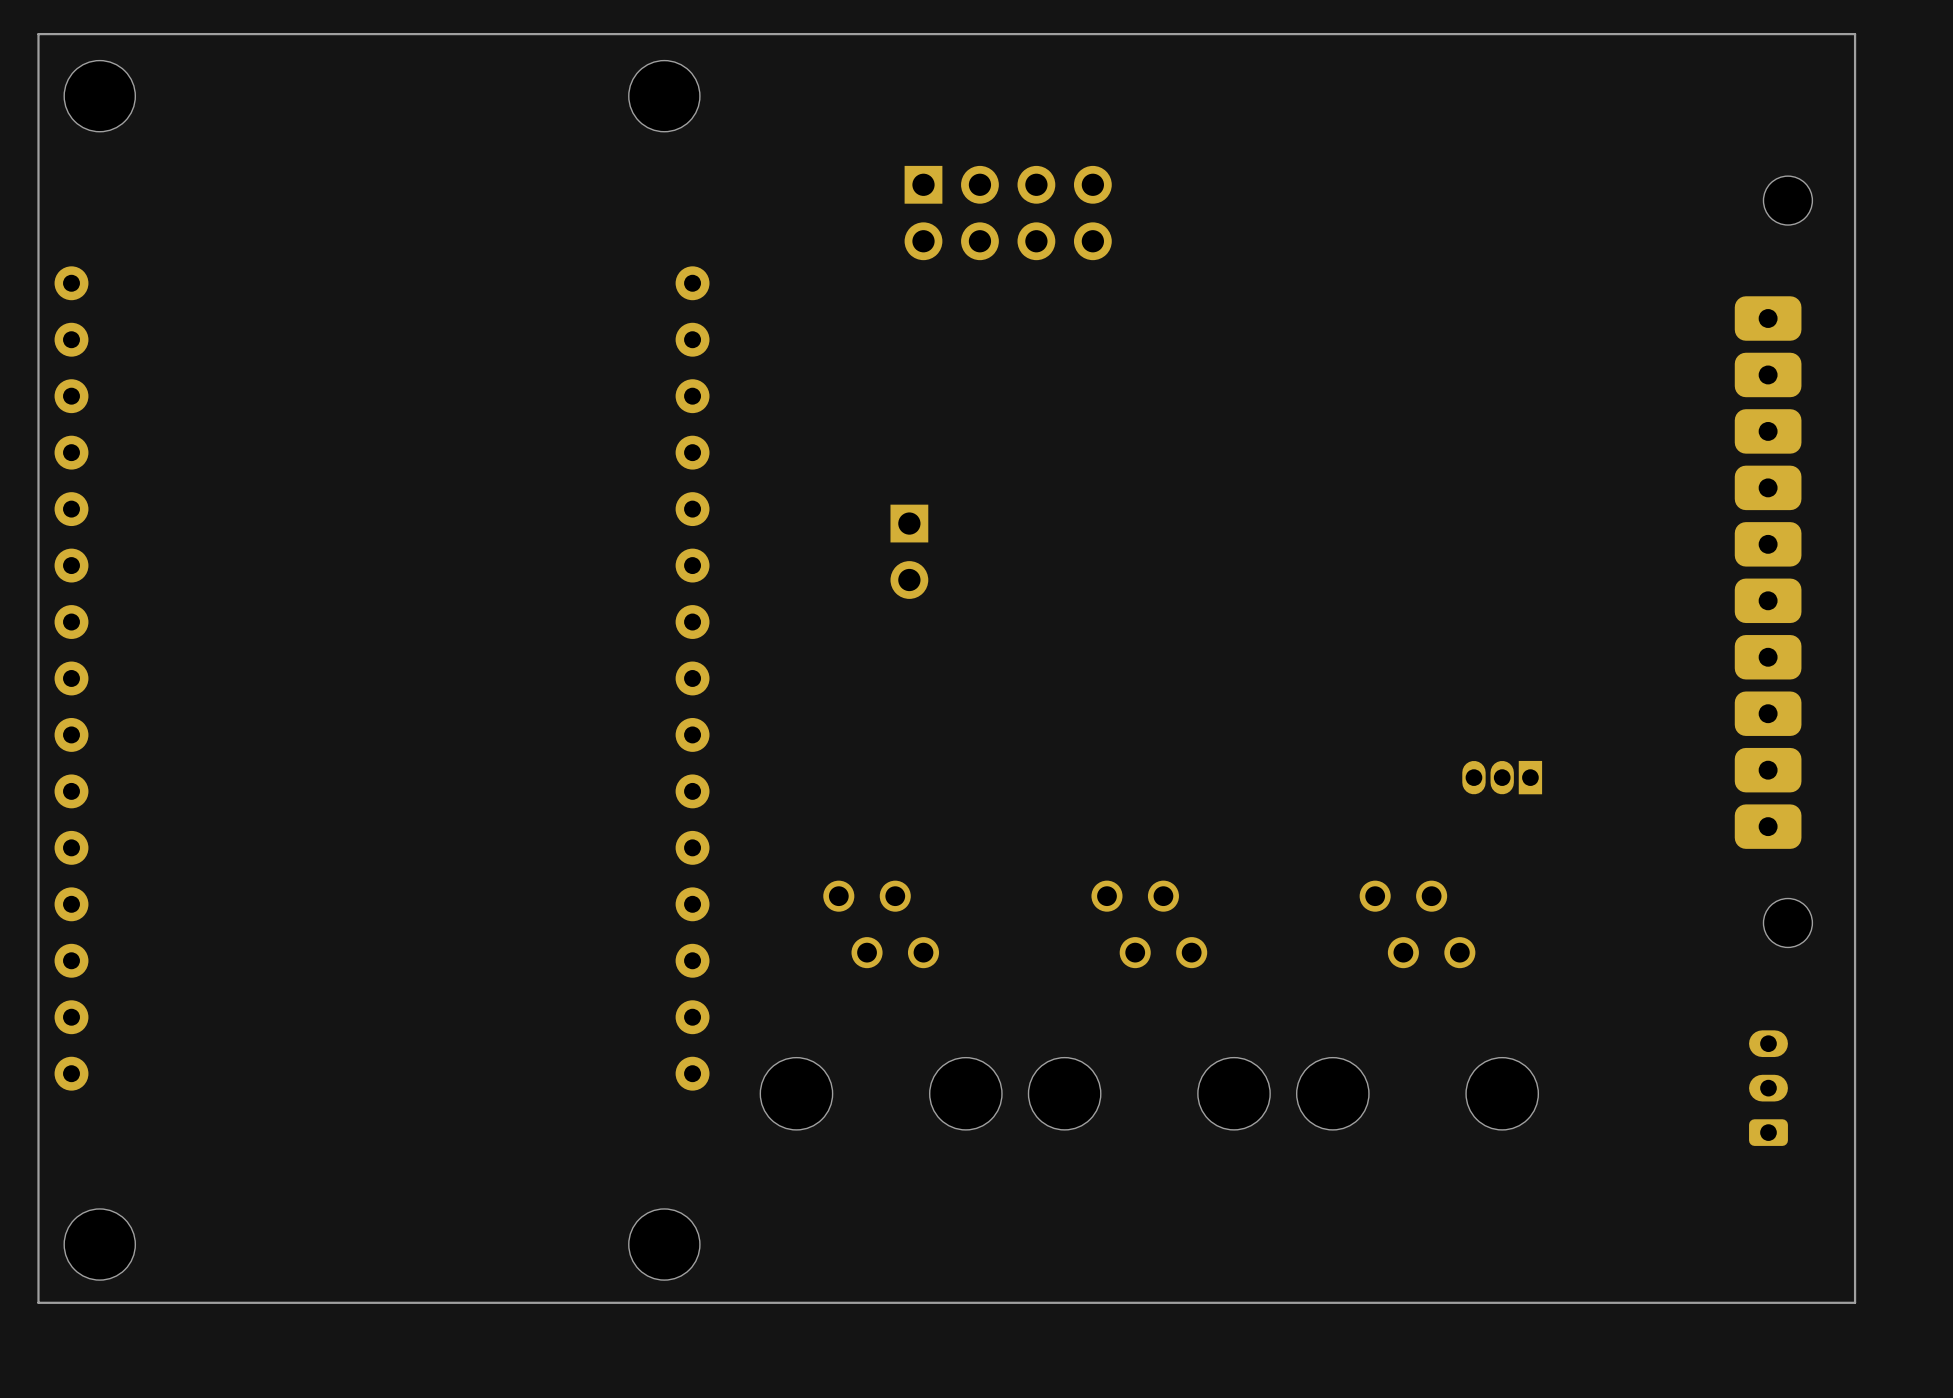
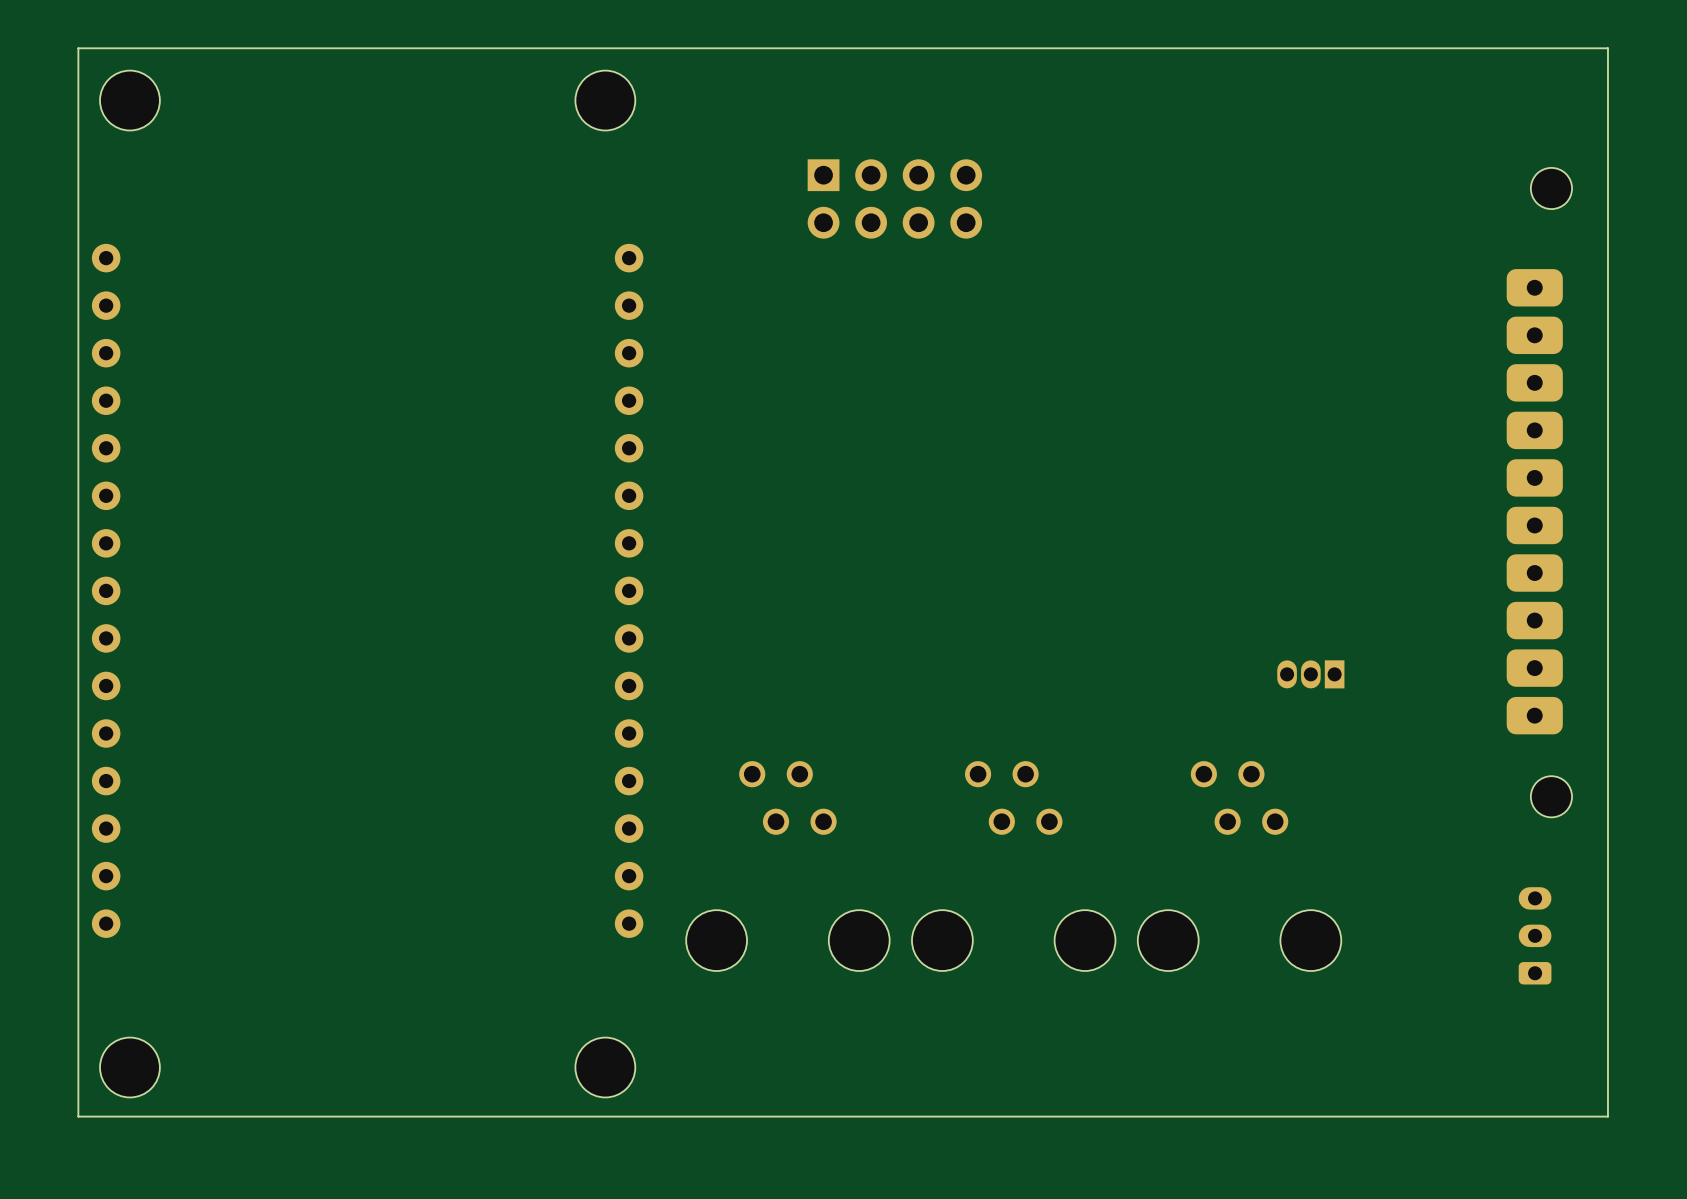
part: (909, 551) -> none

